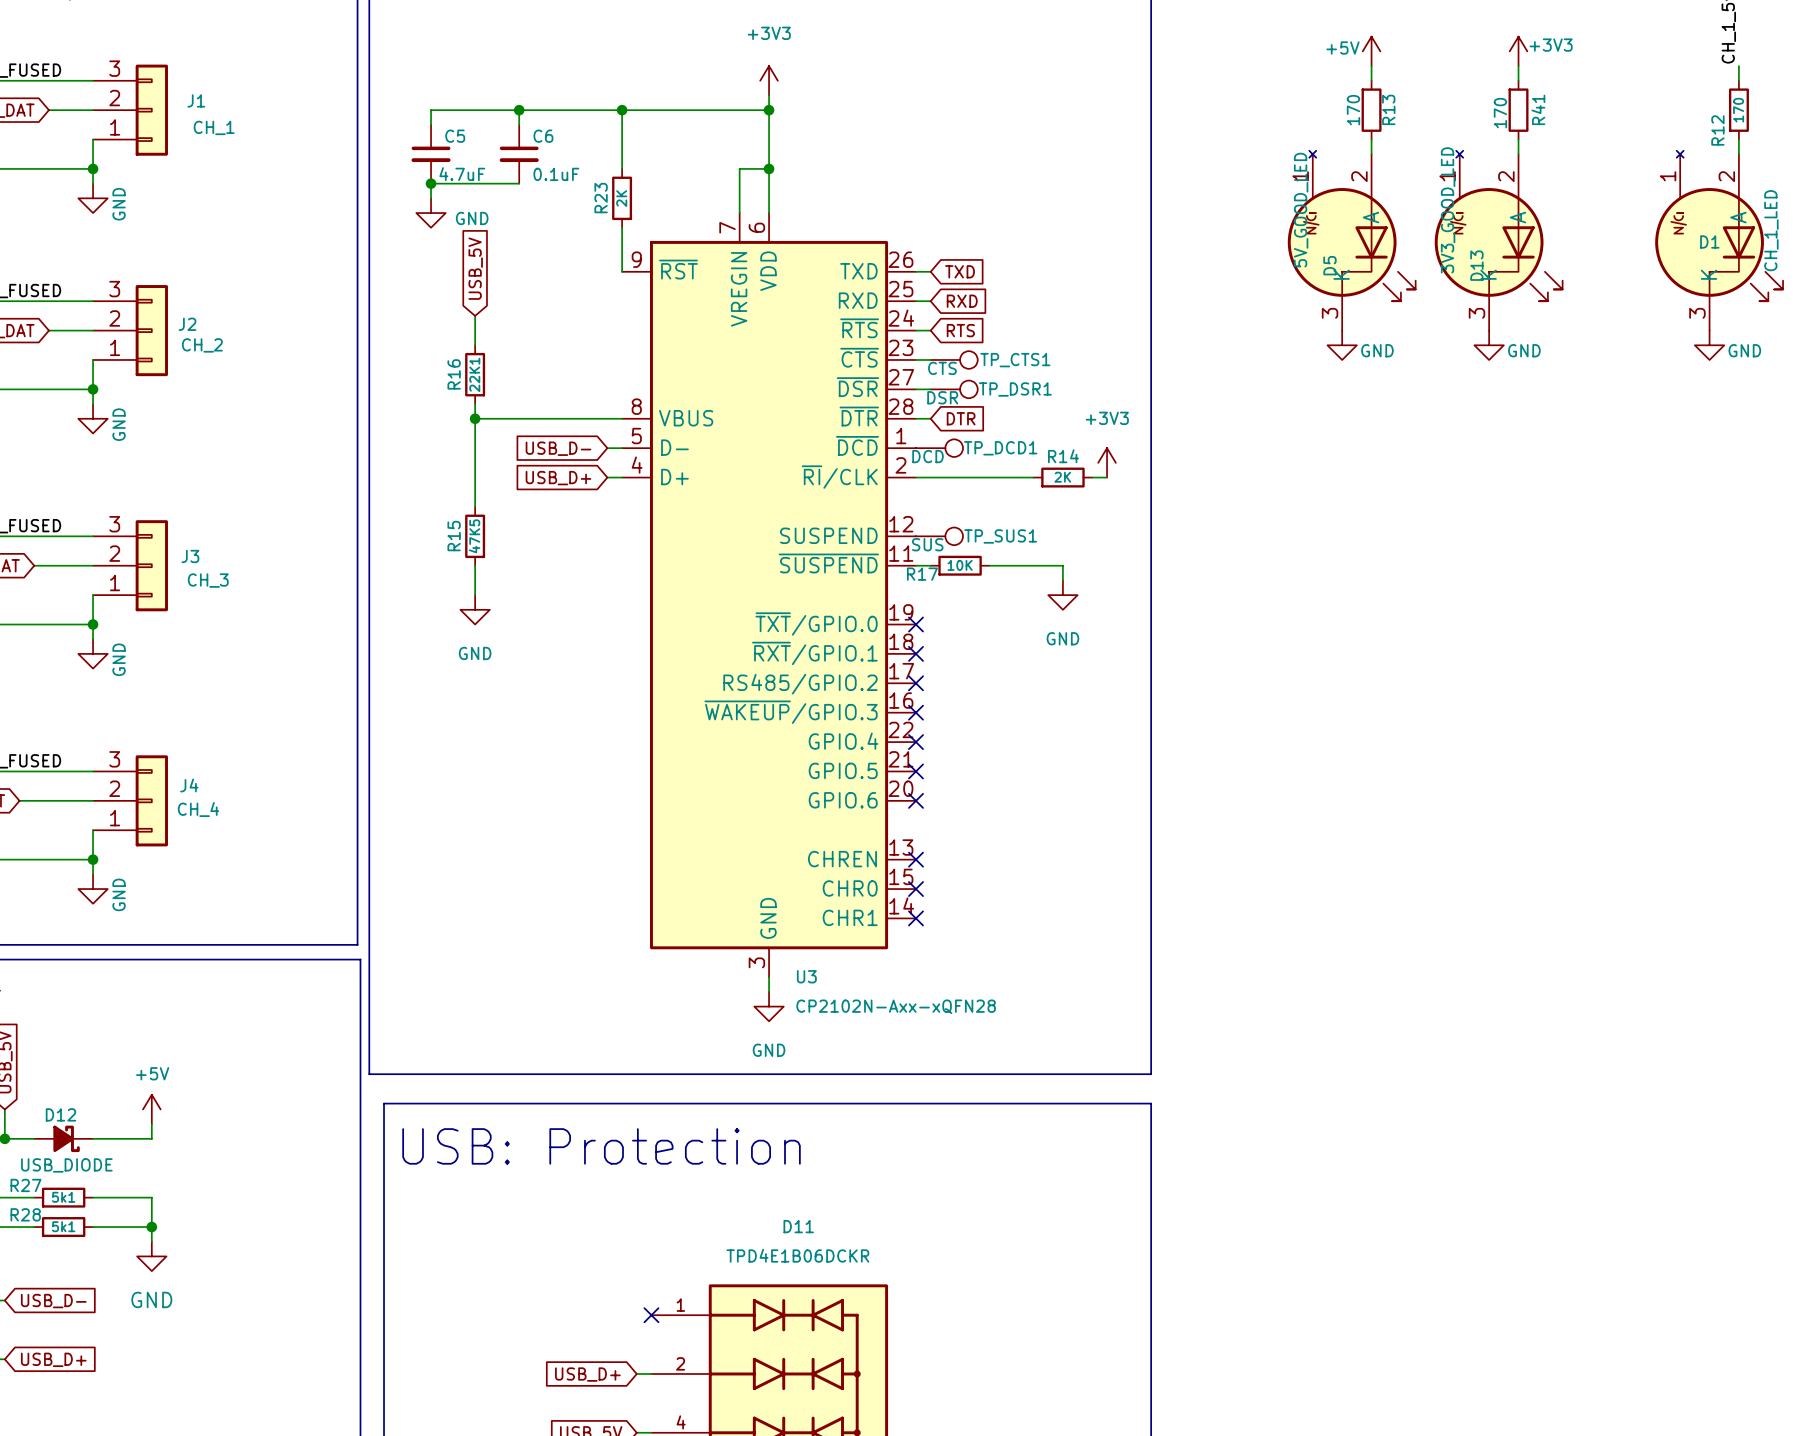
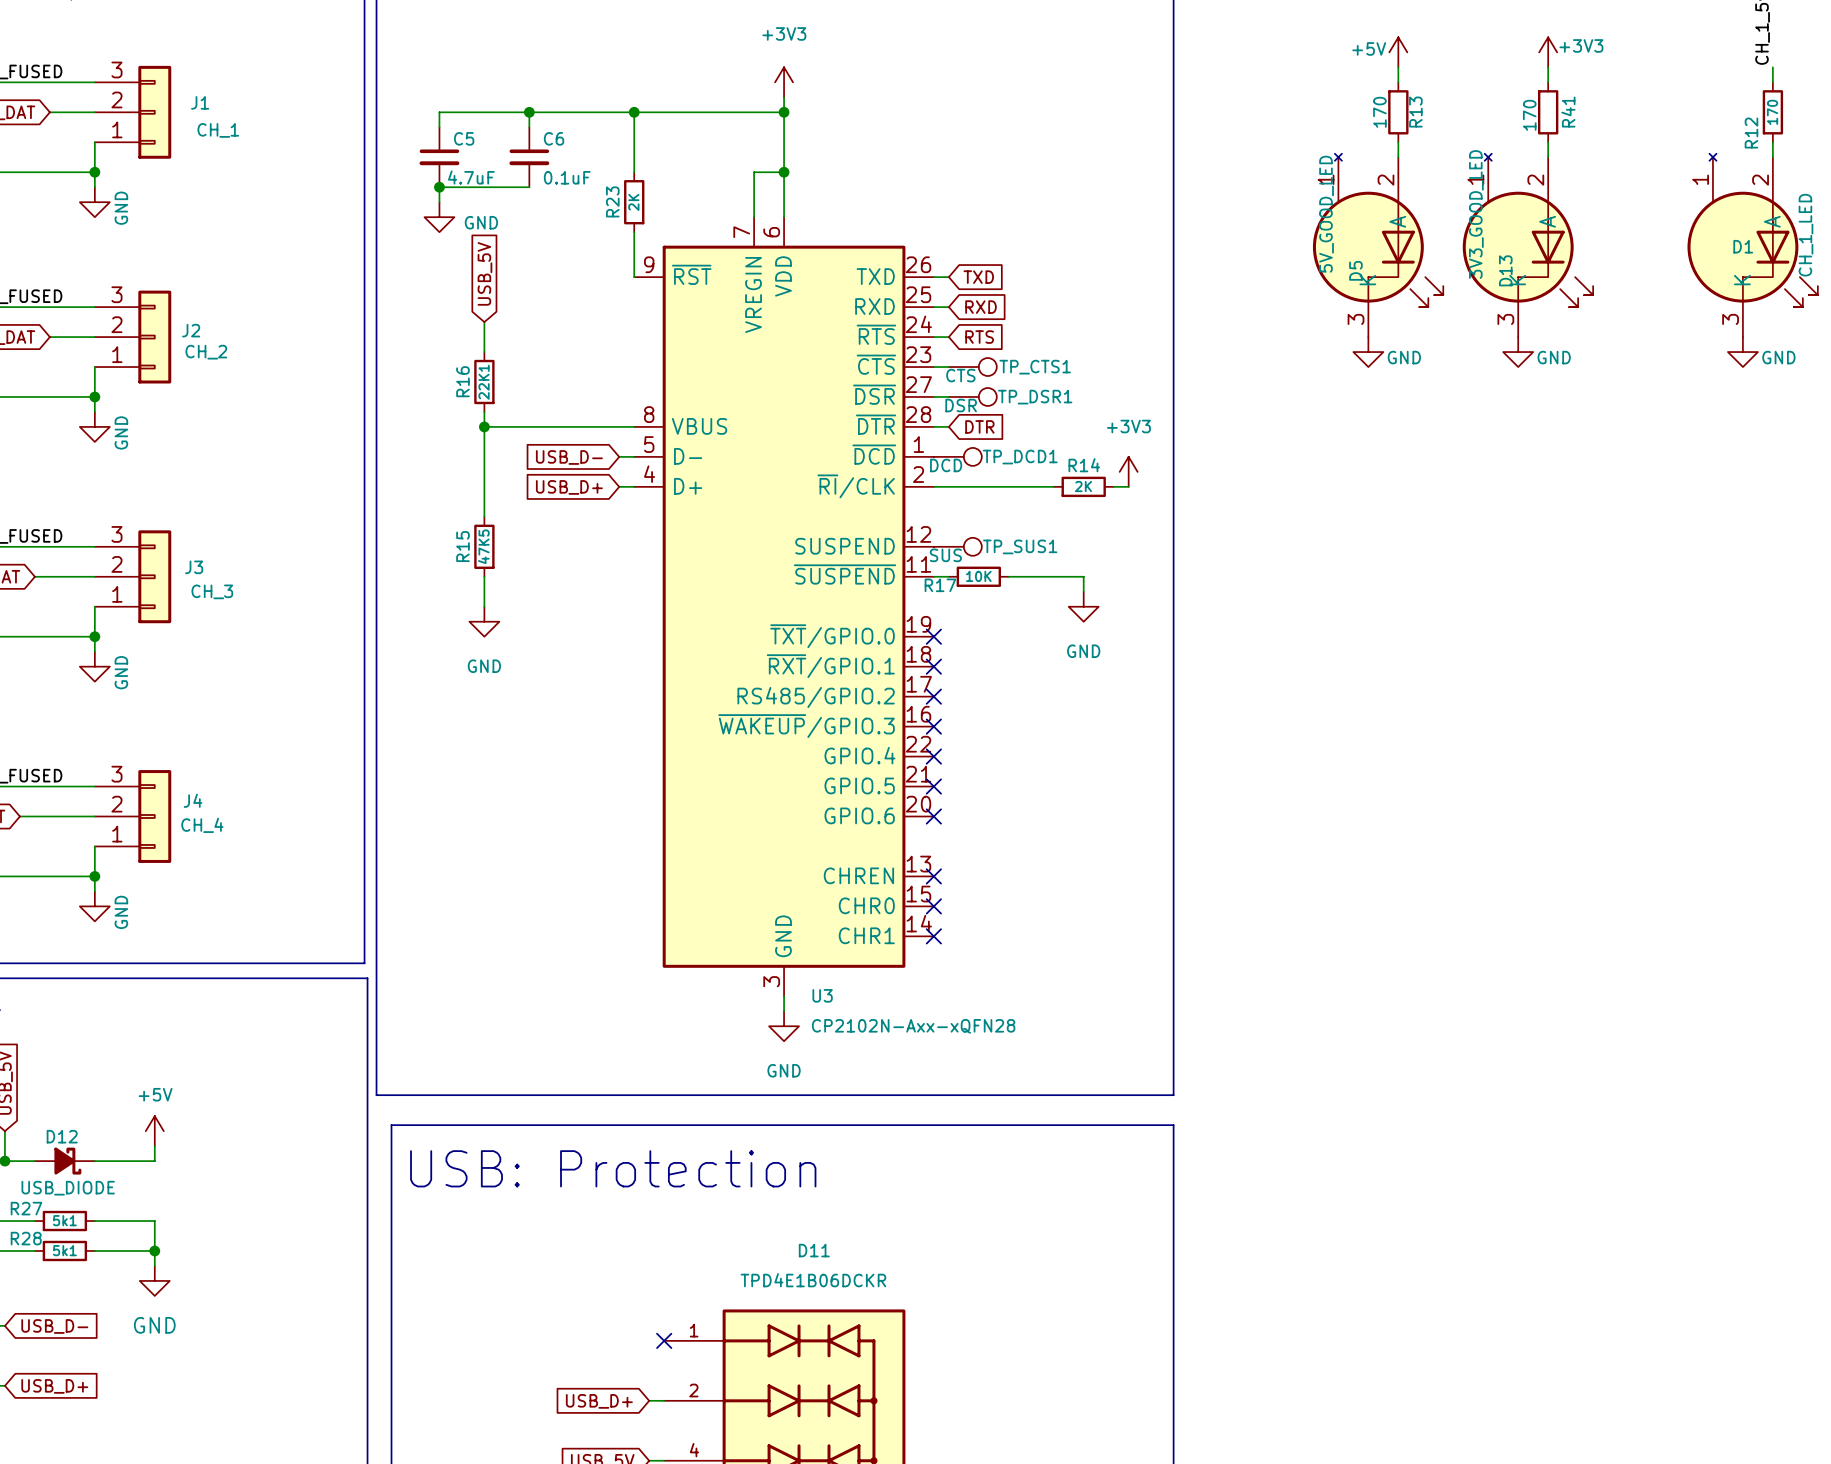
D5 symbol: [1287, 150, 1416, 331] -> [1312, 153, 1444, 338]
D13 symbol: [1434, 150, 1563, 331] -> [1462, 153, 1594, 338]
D1 symbol: [1655, 150, 1784, 331] -> [1687, 153, 1818, 338]

